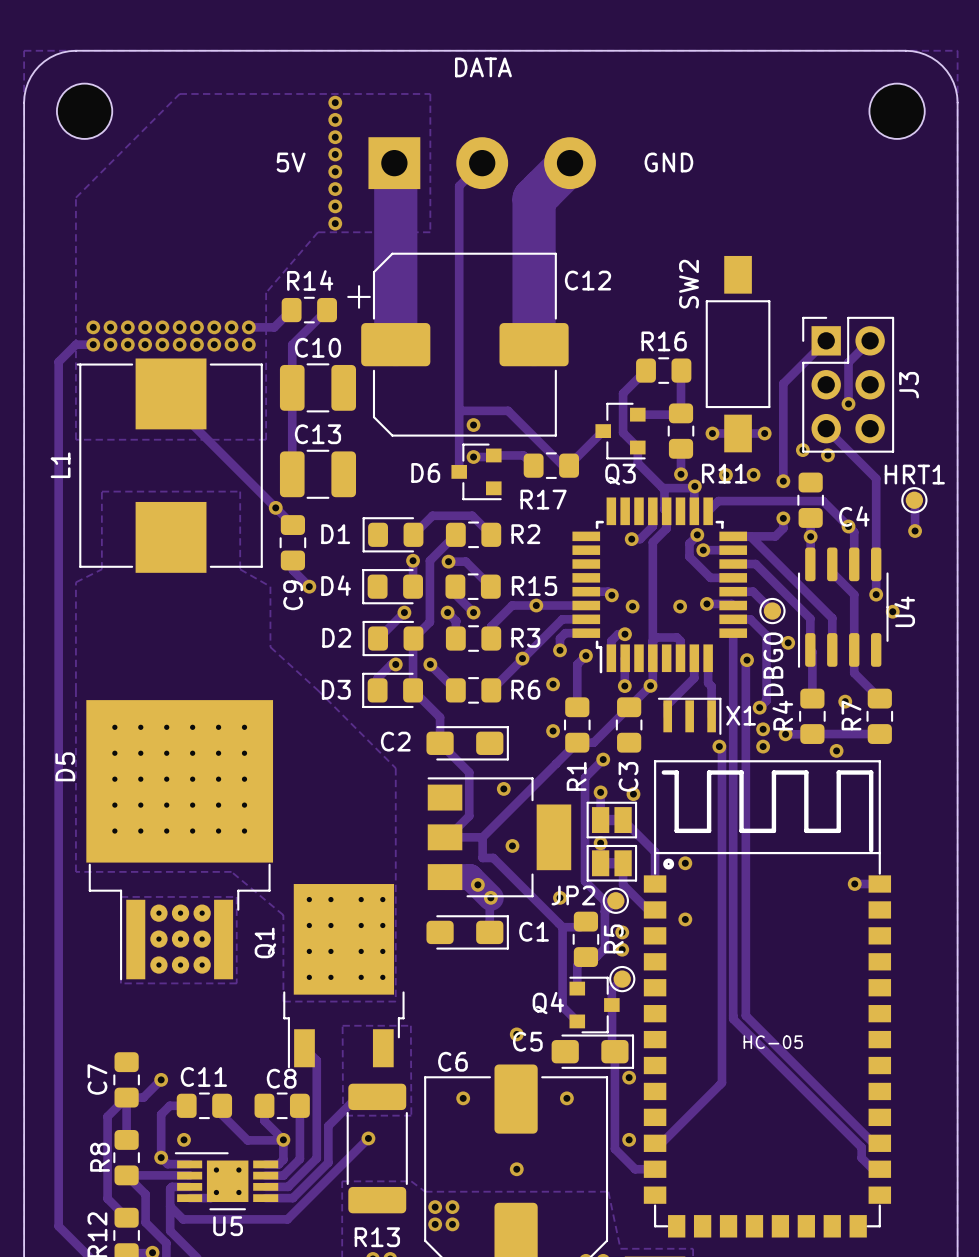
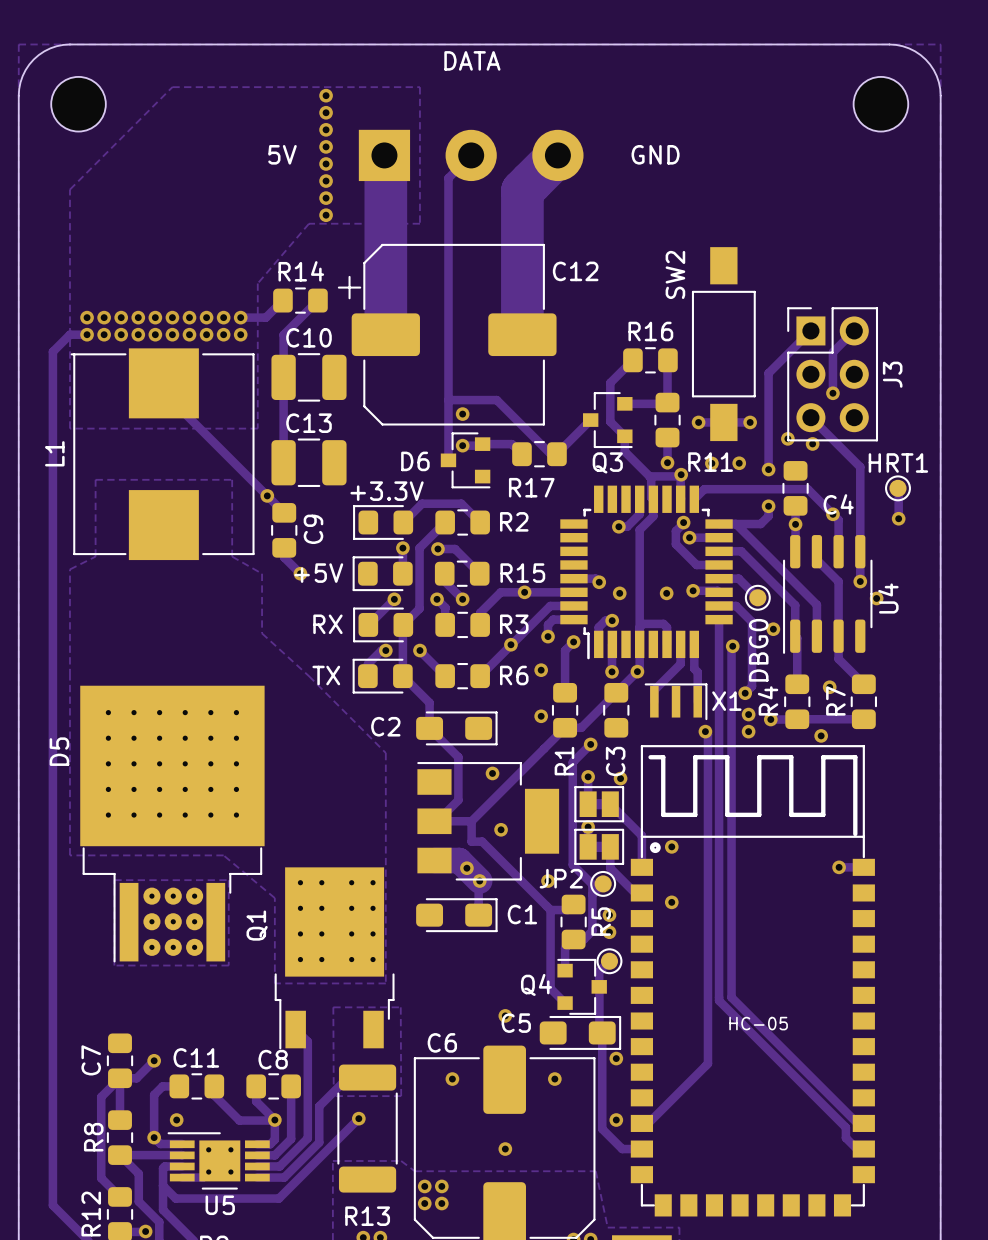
D1 name: D1 (335, 534) -> +3.3V (387, 491)
D4 name: D4 (336, 585) -> +5V (318, 573)
C9 name position: C9 (293, 595) -> C9 (313, 529)
D2 name: D2 (336, 637) -> RX (327, 624)
D3 name: D3 (336, 689) -> TX (326, 675)

